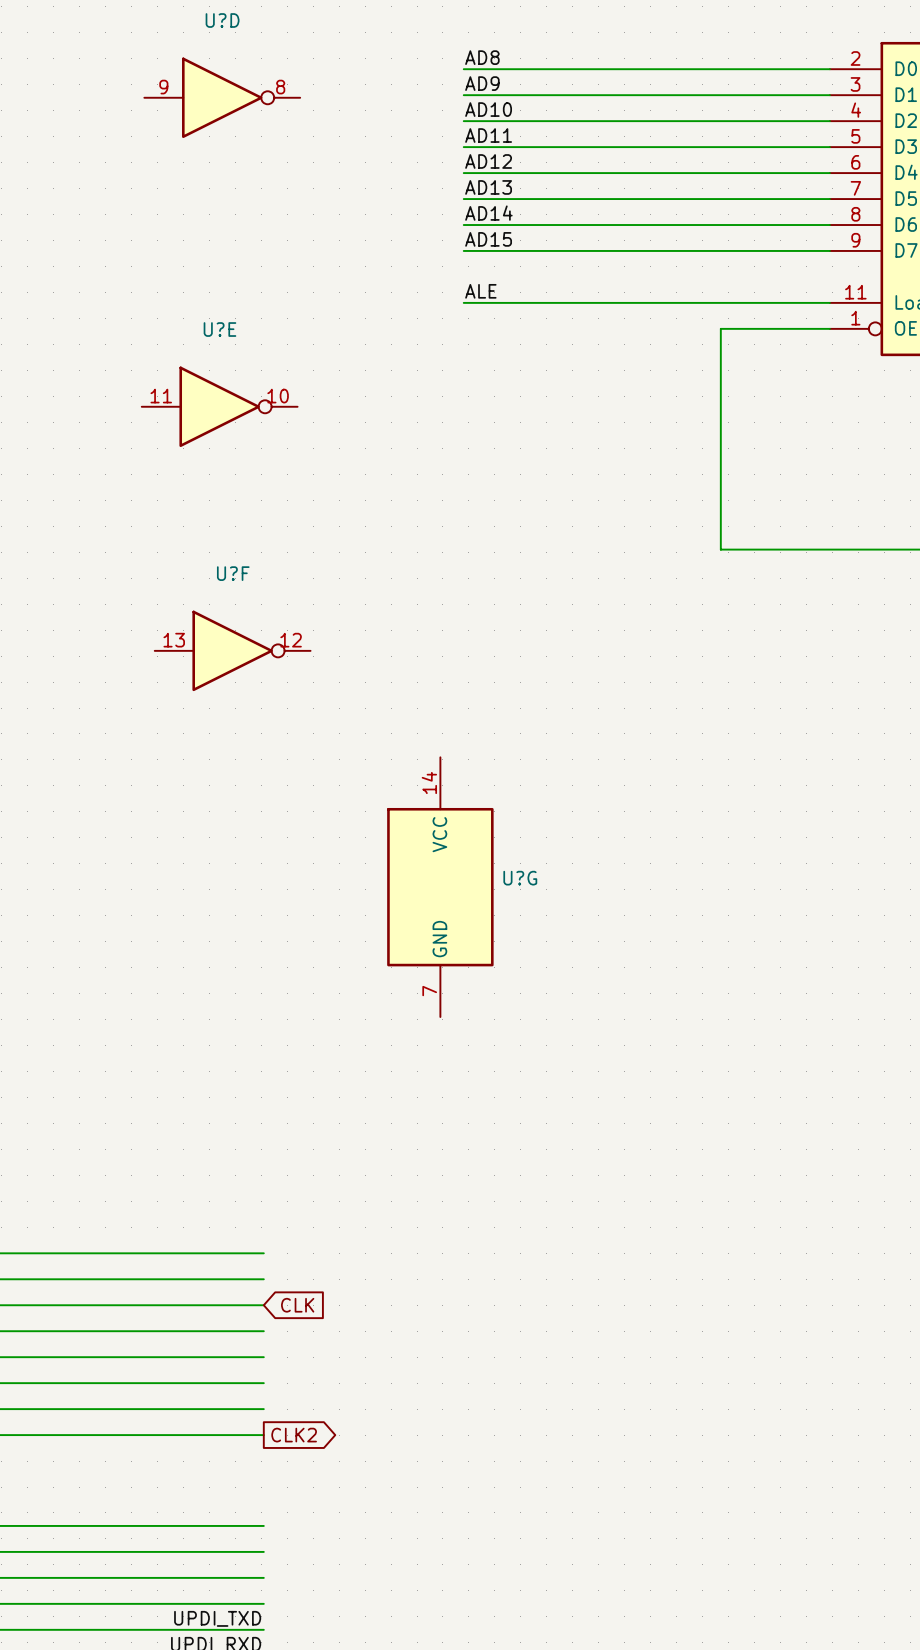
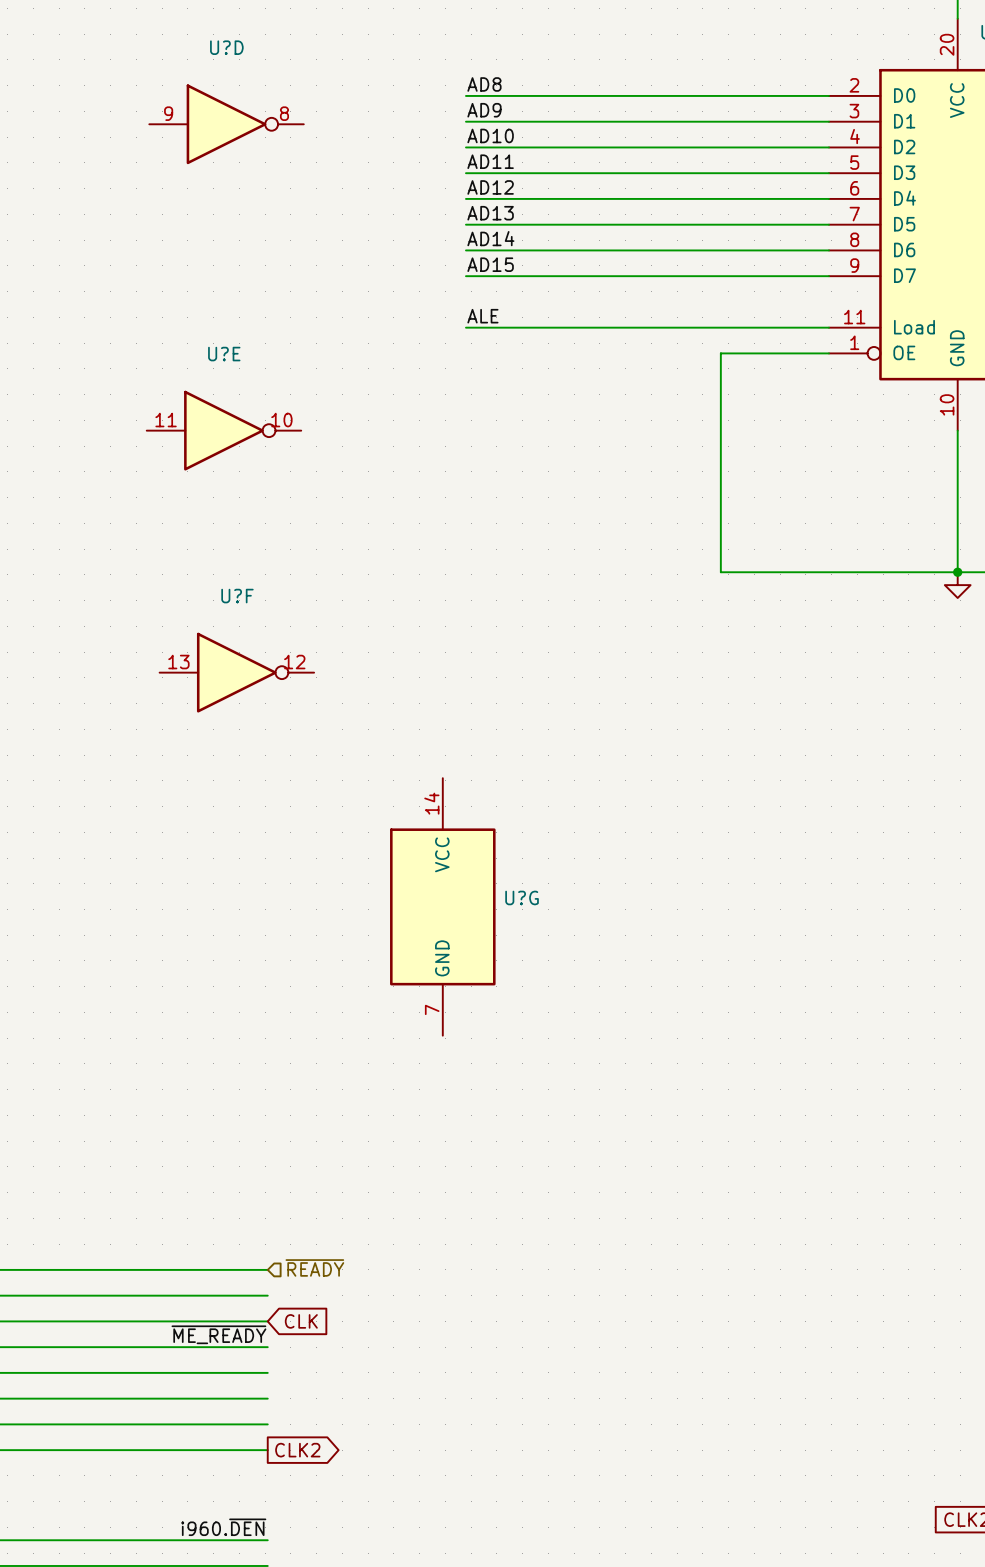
hierarchical label: none -> ~{READY} (314, 1267)
label: none -> ~{ME_READY} (218, 1334)
label: none -> i960.~{DEN} (223, 1527)

